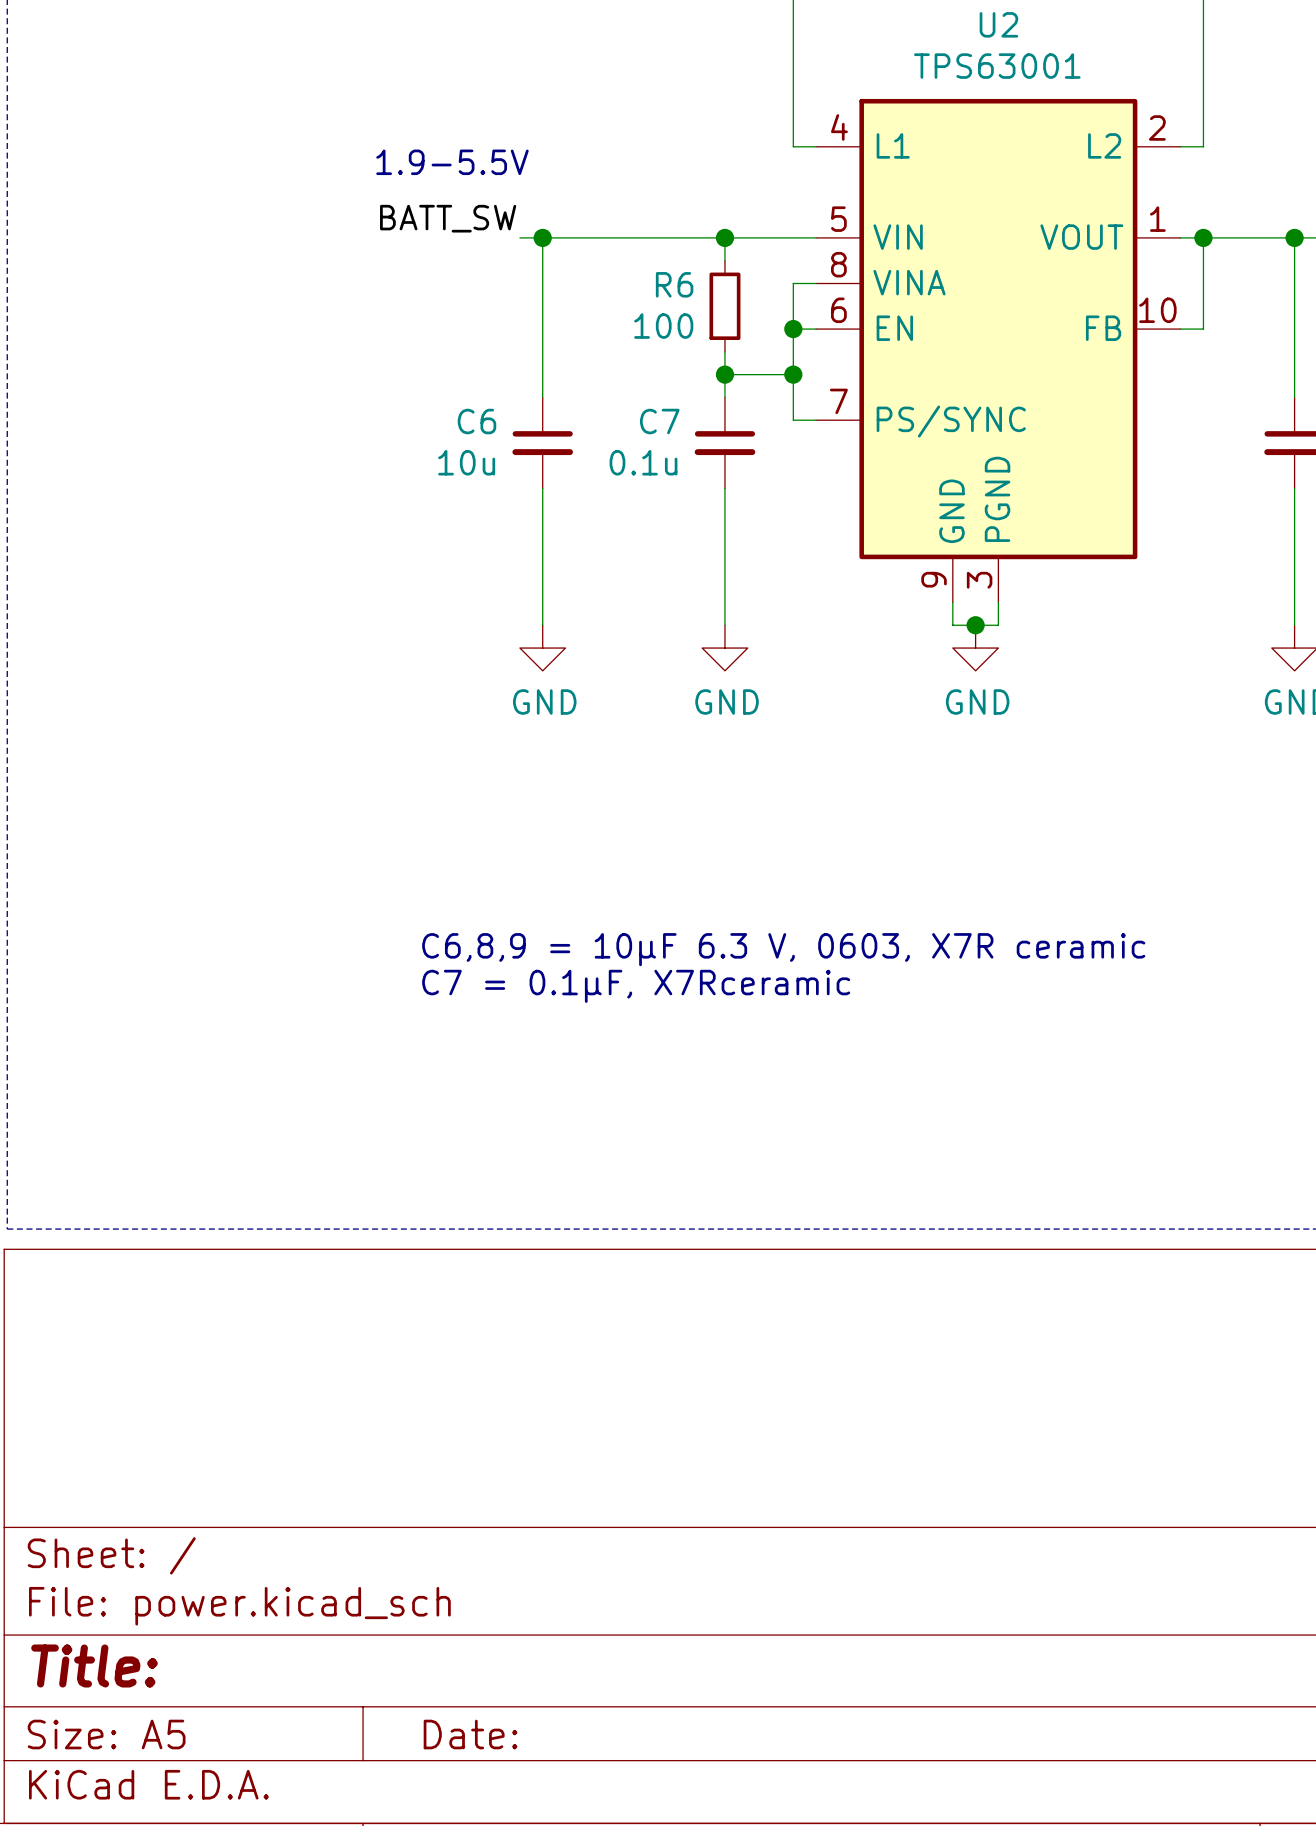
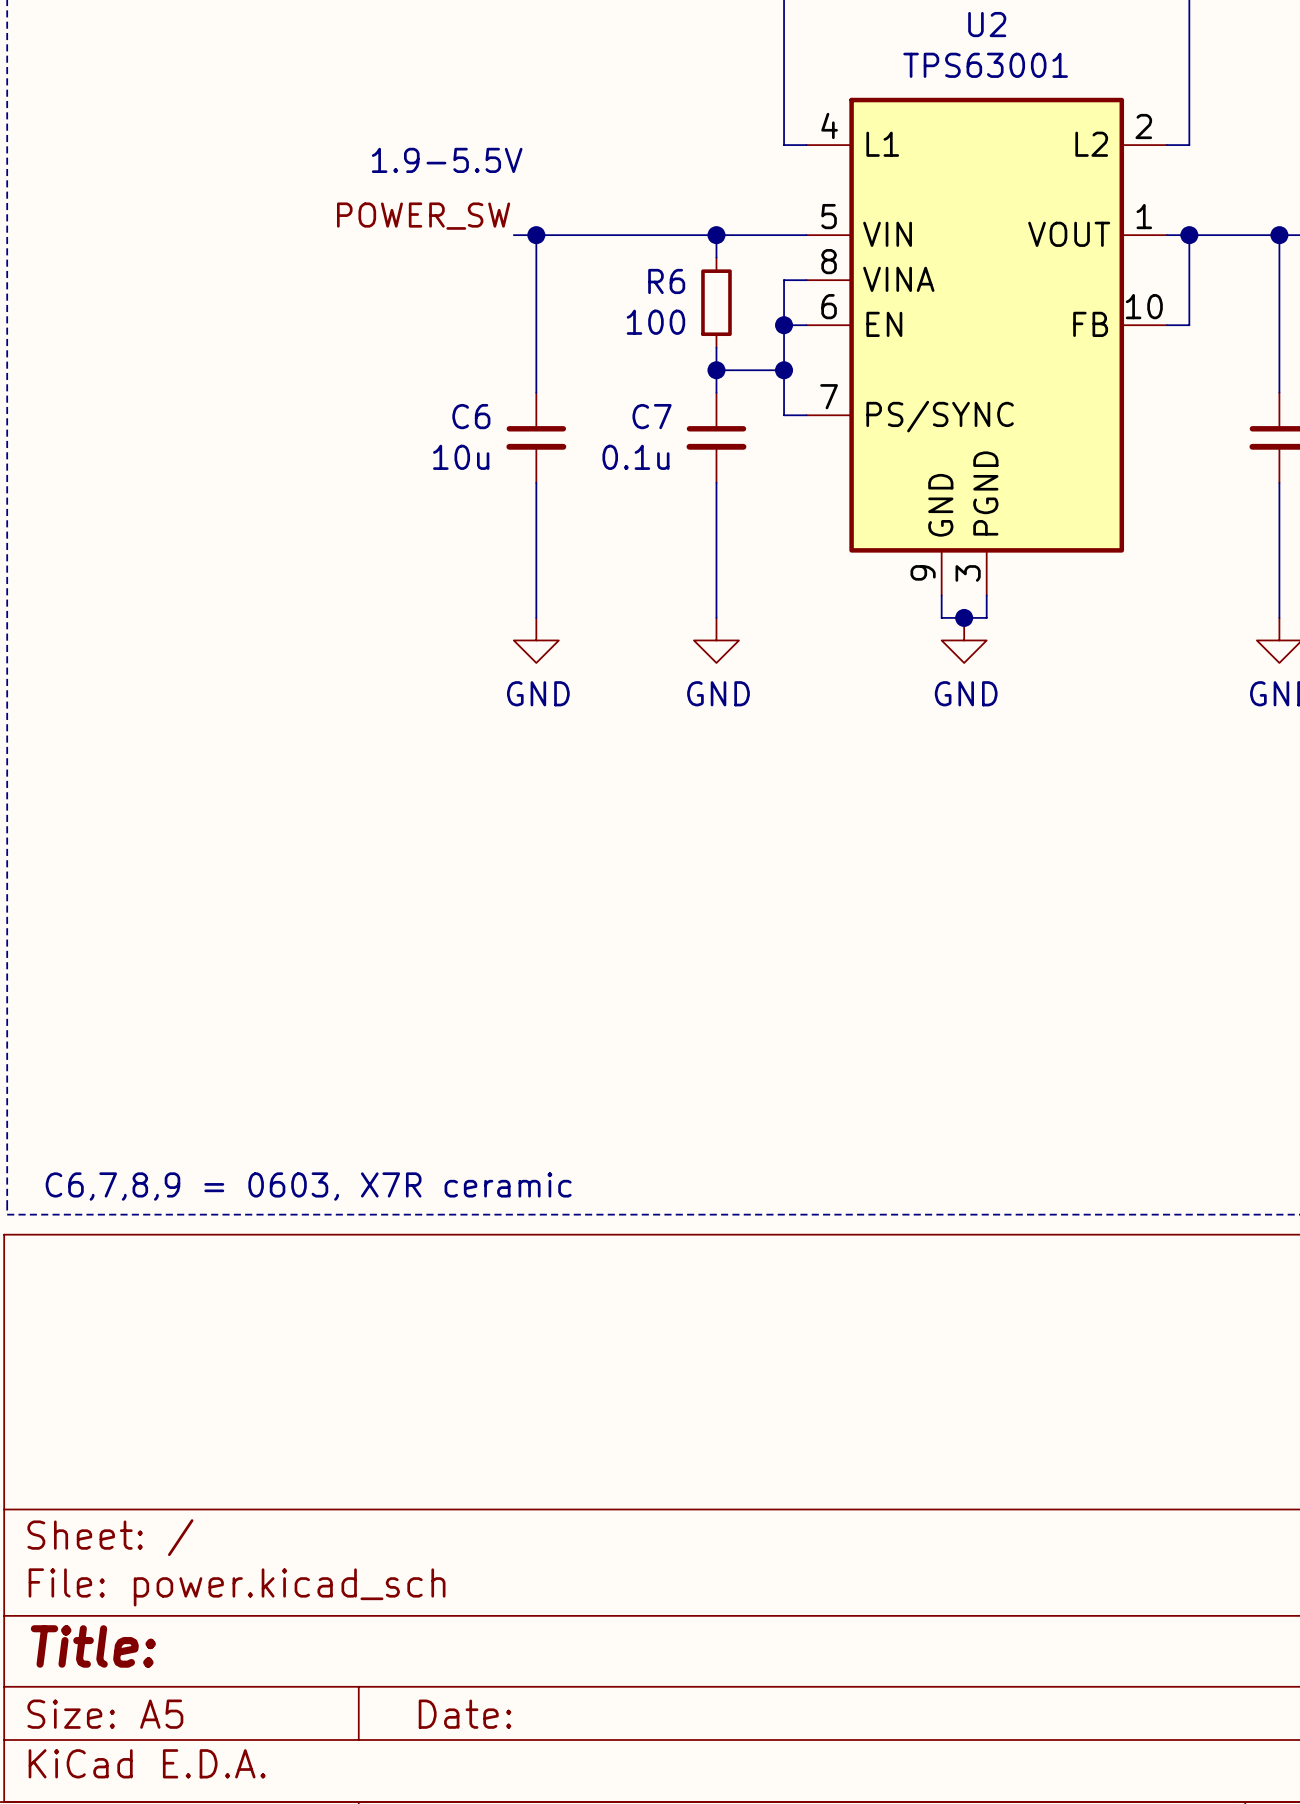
label: BATT_SW (448, 218) -> POWER_SW (423, 216)
text: C6,8,9 = 10μF 6.3 V, 0603, X7R ceramic (783, 949) -> none
text: C7 = 0.1μF, X7Rceramic (636, 986) -> none
text: none -> C6,7,8,9 = 0603, X7R ceramic (308, 1186)

